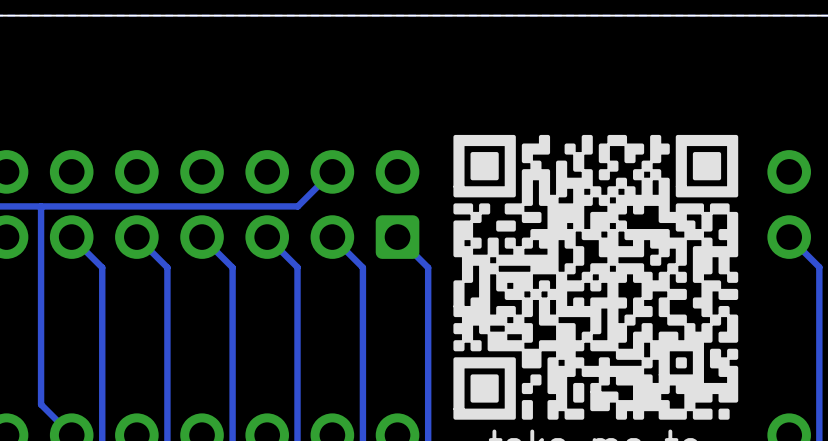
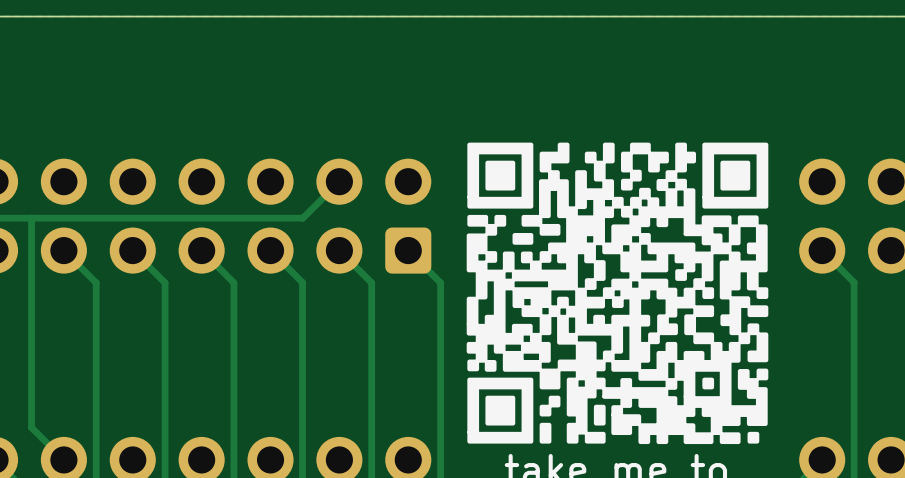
drawing: [453, 160, 593, 352] -> none
drawing shape: [581, 160, 739, 283] -> [602, 170, 768, 300]
drawing: none -> [466, 170, 714, 372]
drawing: [701, 211, 713, 232] -> none
drawing shape: [538, 263, 670, 352] -> [557, 278, 696, 372]
drawing shape: [581, 323, 739, 420] -> [602, 341, 768, 445]
drawing: [641, 357, 653, 369] -> none
drawing: none -> [719, 432, 741, 445]

